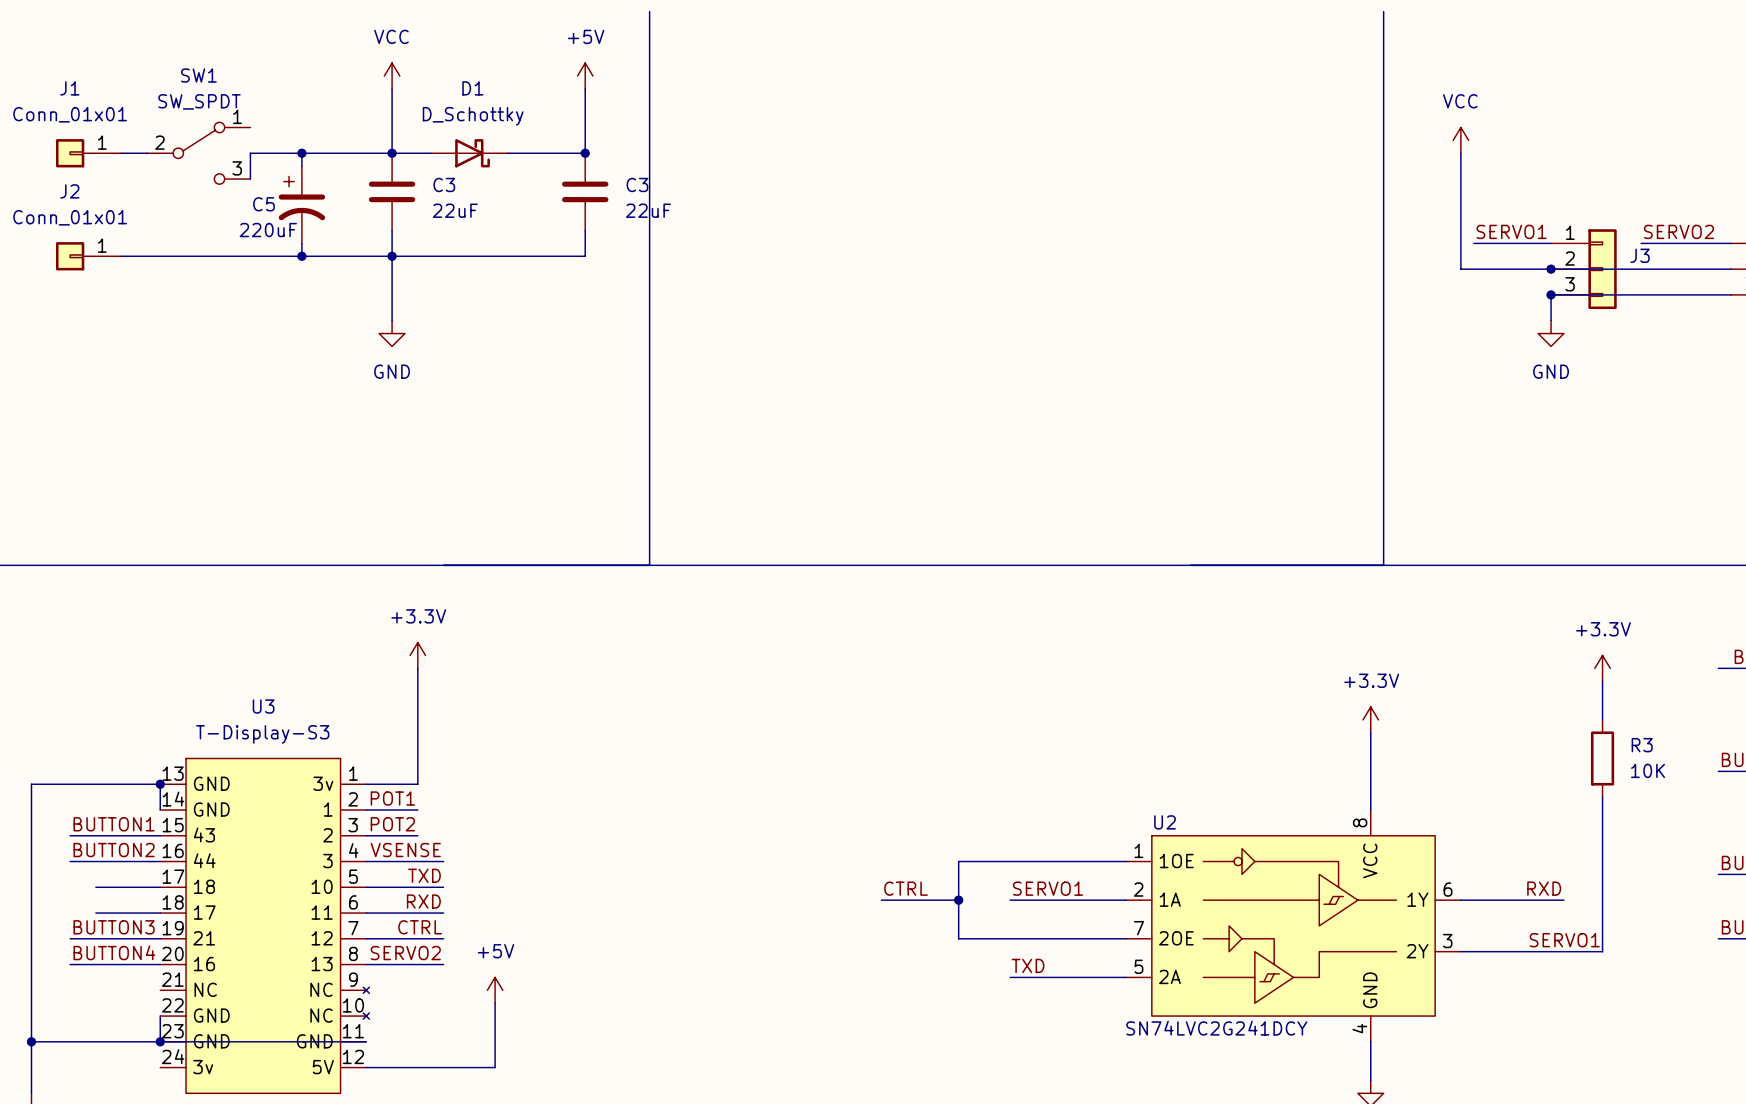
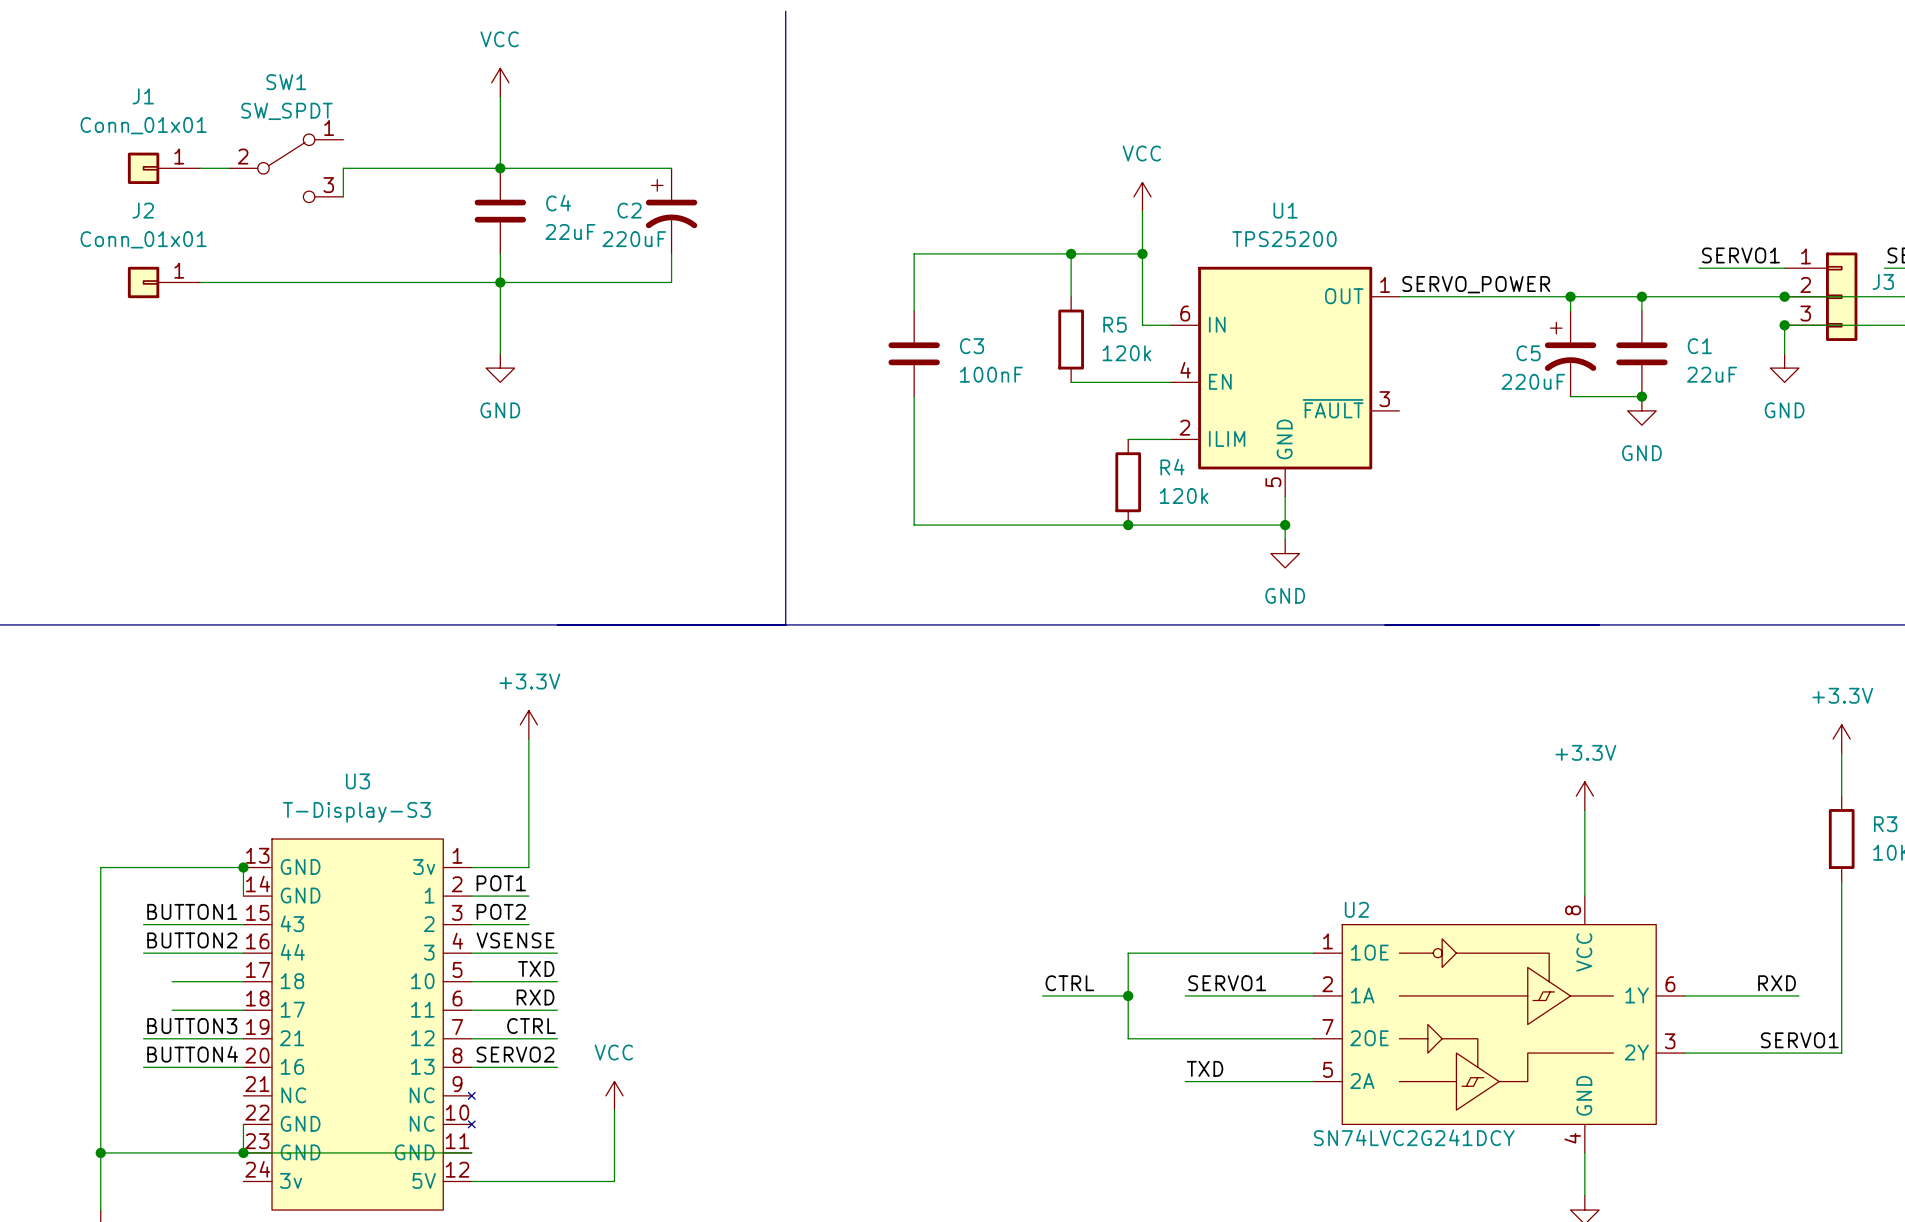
line: (1383, 11) (1383, 565) -> none
power symbol: +5V (585, 75) -> none
wire: (585, 88) (585, 153) (546, 153) -> none
power symbol: VCC (1460, 140) -> none
wire: (301, 153) (301, 166) -> none
junction: (301, 153) -> none
D1: D_Schottky (469, 153) -> none
junction: (585, 153) -> none
wire: (1460, 153) (1460, 269) -> (1399, 296) (1684, 296)
power symbol: none -> VCC (1142, 196)
C3 name: C3 (444, 184) -> C4 (558, 203)
C2: none -> 220uF (671, 211)
C3: 22uF (585, 191) -> none
wire: none -> (1142, 211) (1142, 325) (1171, 325)
C5 position: (301, 204) -> (1570, 353)
wire: (585, 230) (585, 256) (546, 256) -> (671, 253) (671, 282)
wire: none -> (1071, 253) (1071, 296)
junction: none -> (1071, 253)
wire: none -> (1142, 253) (914, 253) (914, 311)
junction: none -> (1142, 253)
wire: (301, 243) (301, 256) -> none
junction: (301, 256) -> none
label: none -> SERVO_POWER (1476, 284)
wire: none -> (1570, 296) (1570, 311)
junction: none -> (1570, 296)
wire: none -> (1641, 296) (1641, 311)
junction: none -> (1641, 296)
R5: none -> 120k (1071, 339)
C3: none -> 100nF (914, 353)
C1: none -> 22uF (1641, 353)
U1: none -> TPS25200 (1285, 381)
wire: none -> (1071, 382) (1171, 382)
wire: none -> (914, 396) (914, 525) (1285, 525)
wire: none -> (1570, 396) (1641, 396)
junction: none -> (1641, 396)
power symbol: none -> GND (1641, 410)
wire: none -> (1128, 439) (1171, 439)
R4: none -> 120k (1128, 482)
wire: none -> (1285, 496) (1285, 539)
junction: none -> (1128, 525)
junction: none -> (1285, 525)
power symbol: none -> GND (1285, 553)
power symbol: +5V (495, 990) -> VCC (614, 1095)

